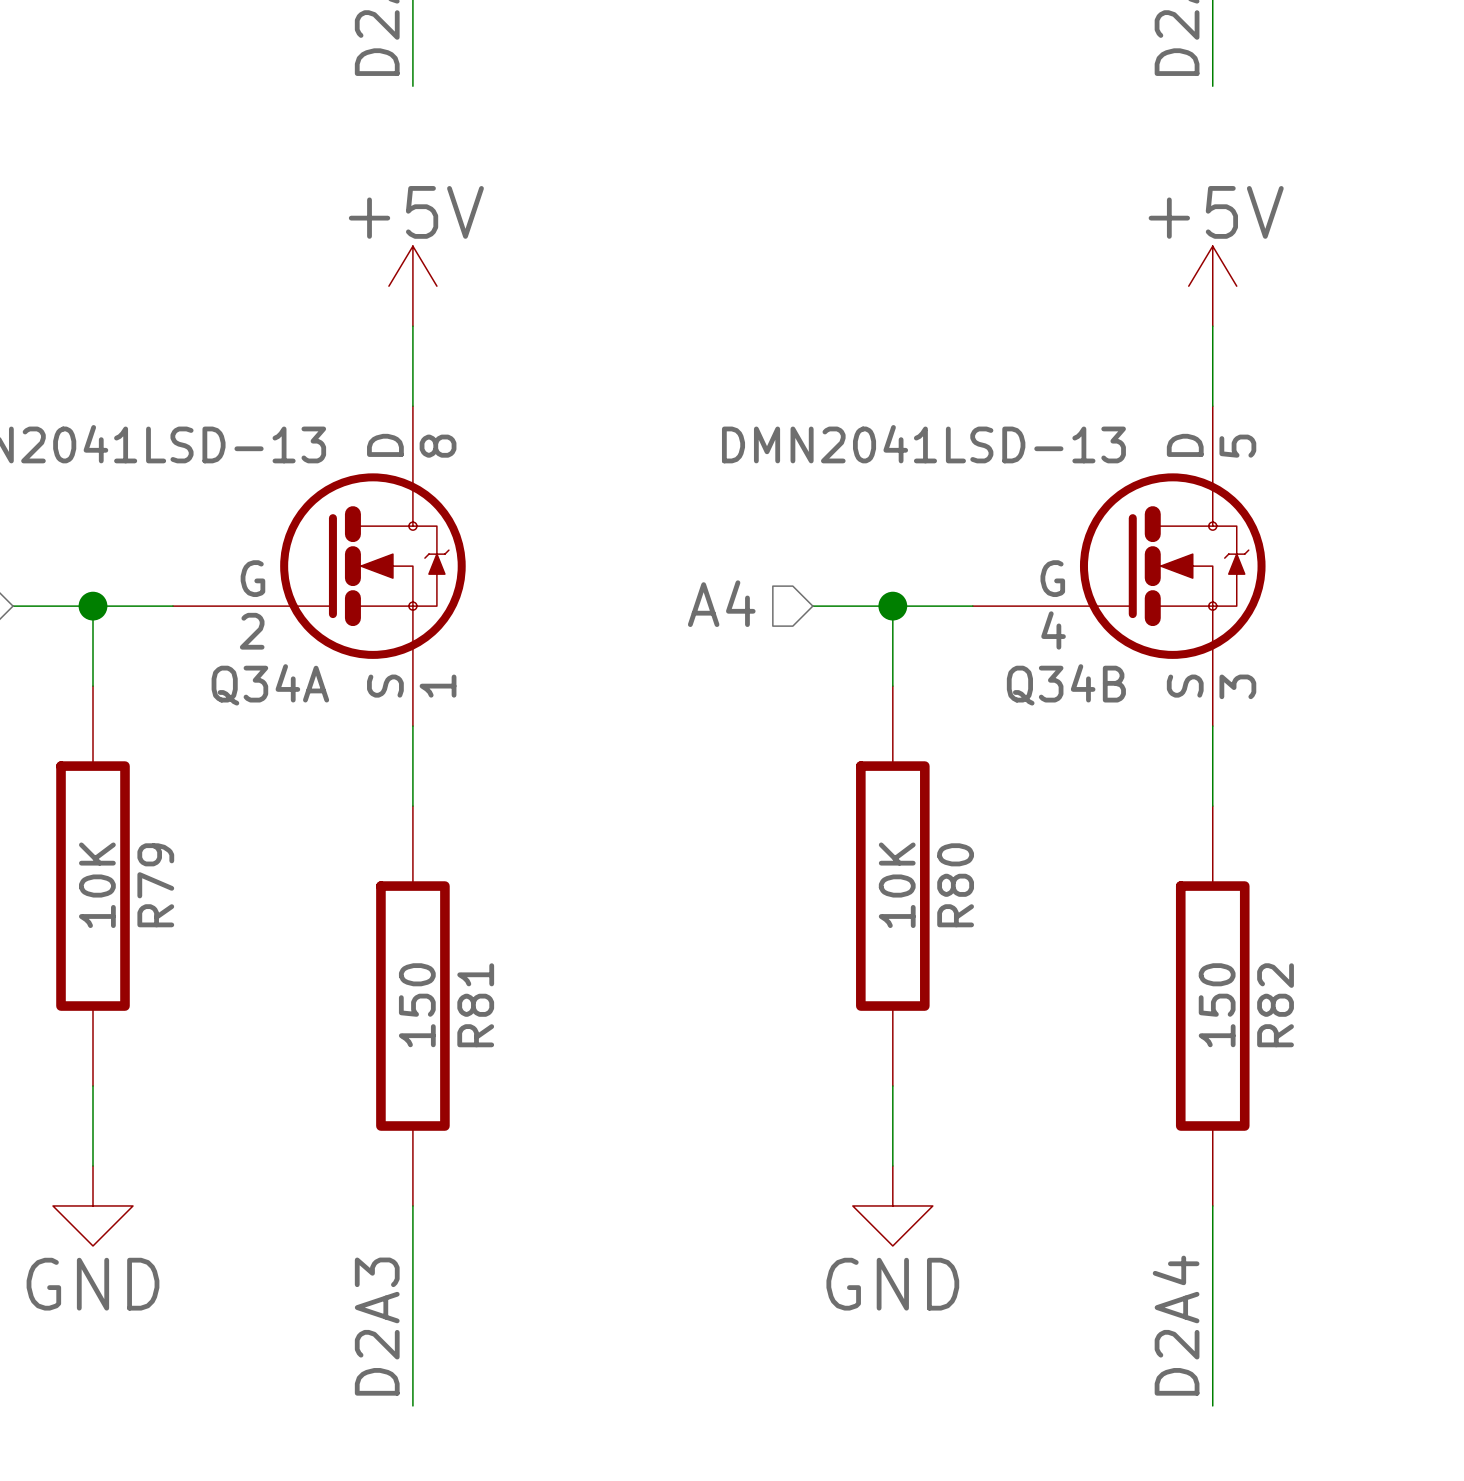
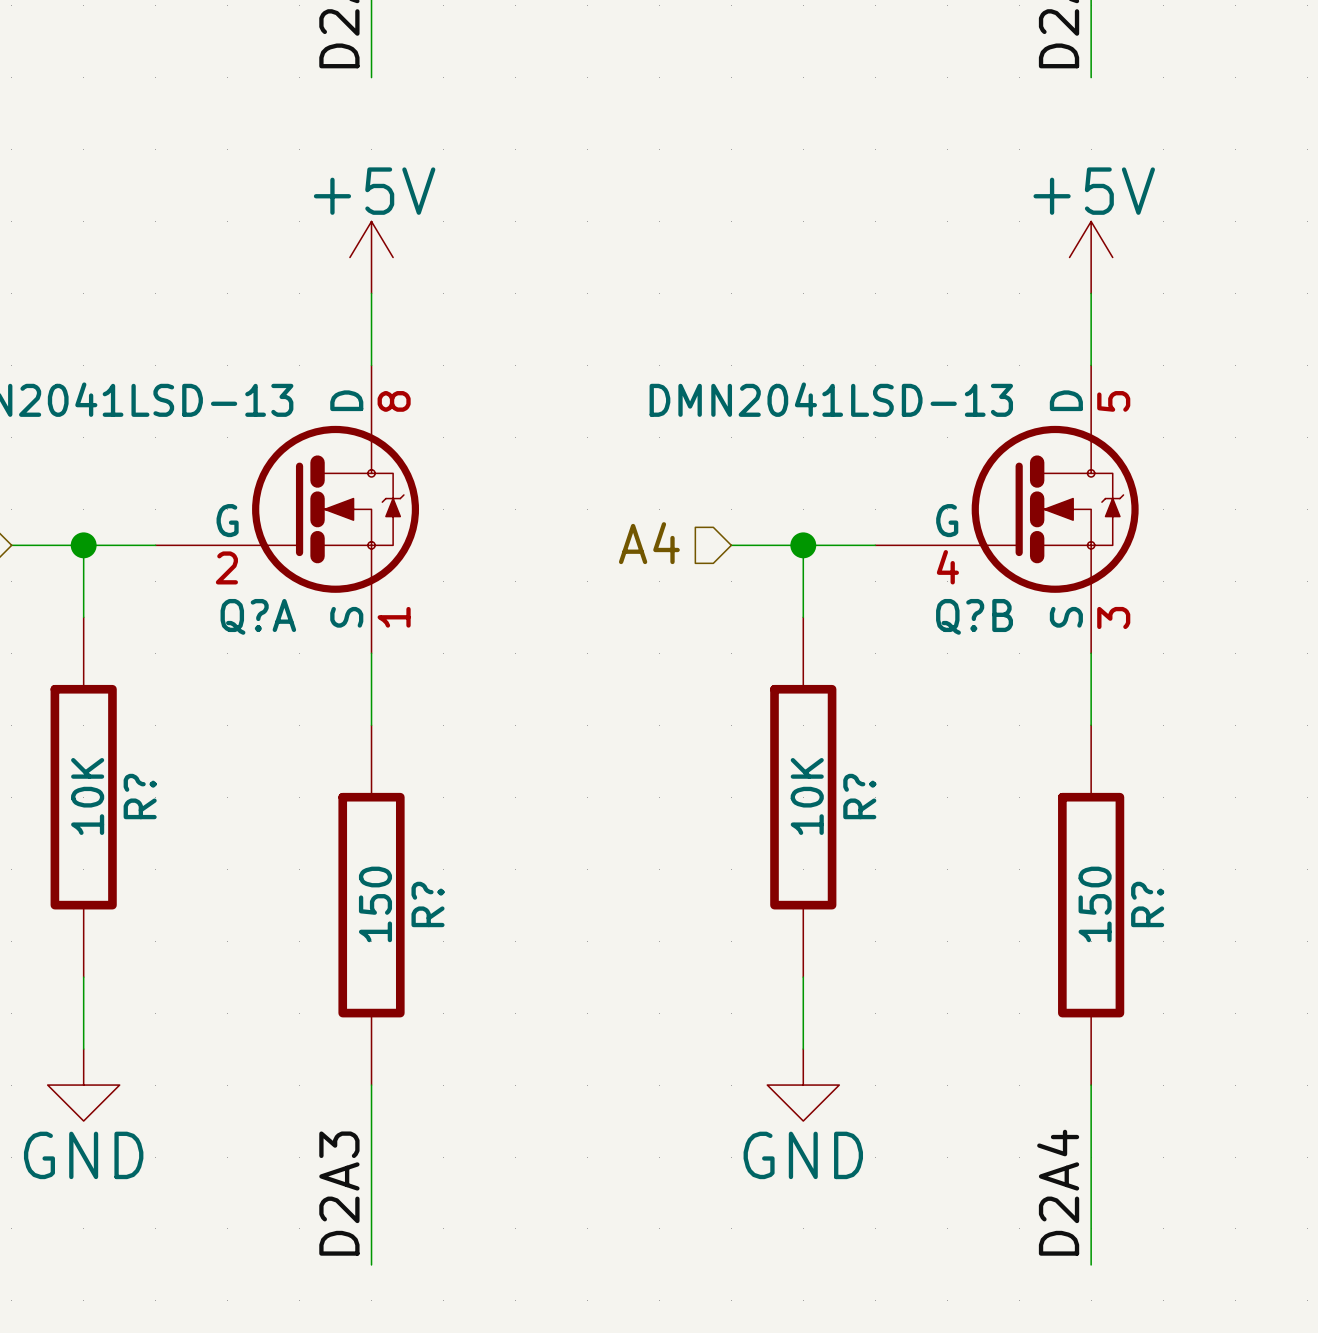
Q34A name: Q34A (270, 684) -> Q?A (258, 616)
Q34B name: Q34B (1066, 684) -> Q?B (974, 616)
R79 name: R79 (155, 885) -> R? (140, 796)
R80 name: R80 (955, 885) -> R? (859, 796)
R81 name: R81 (475, 1005) -> R? (428, 904)
R82 name: R82 (1275, 1005) -> R? (1147, 904)

